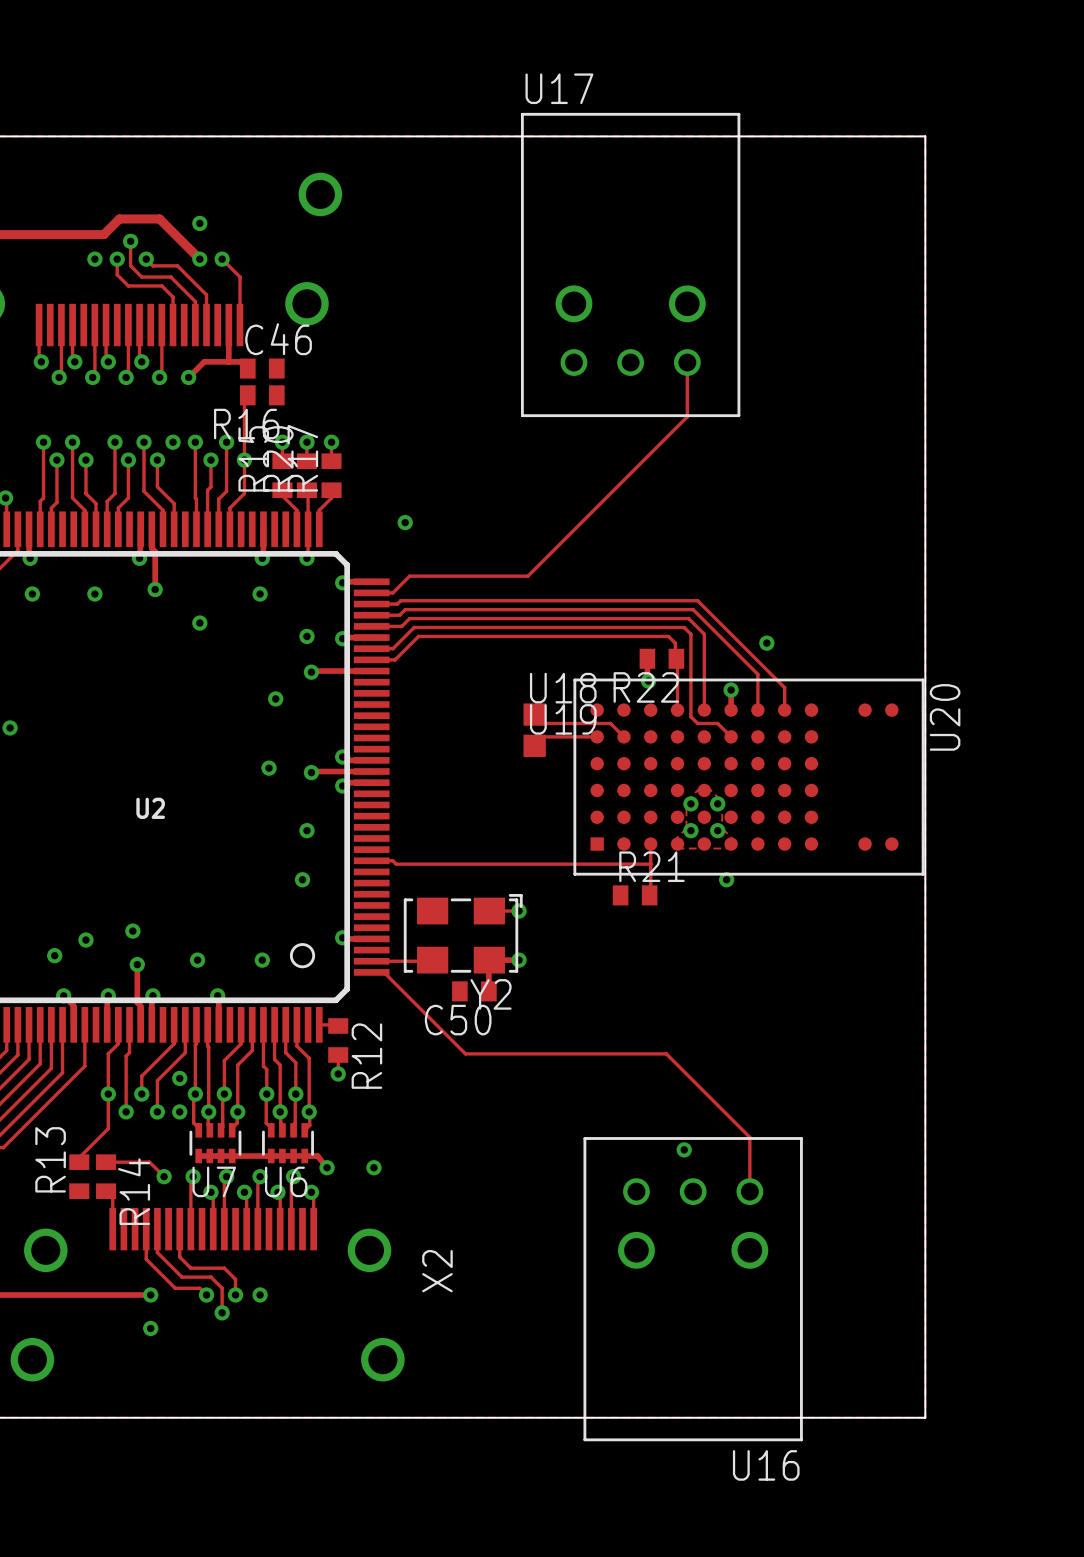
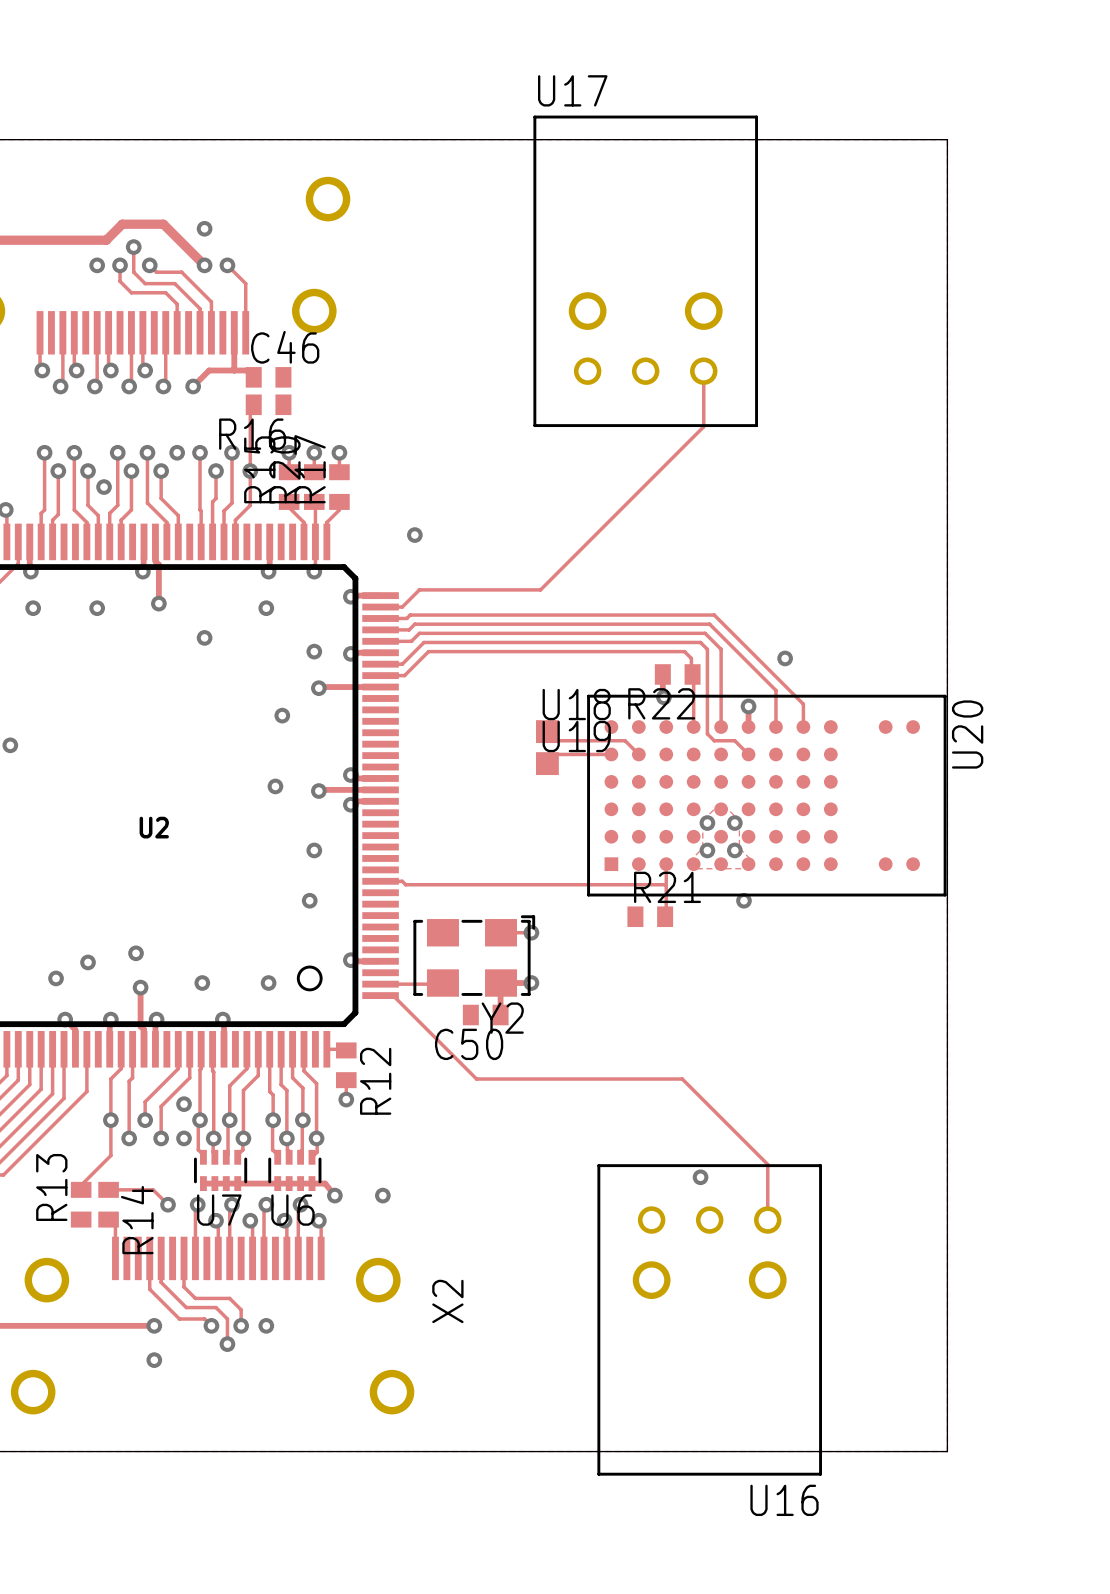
via: none -> (104, 487)

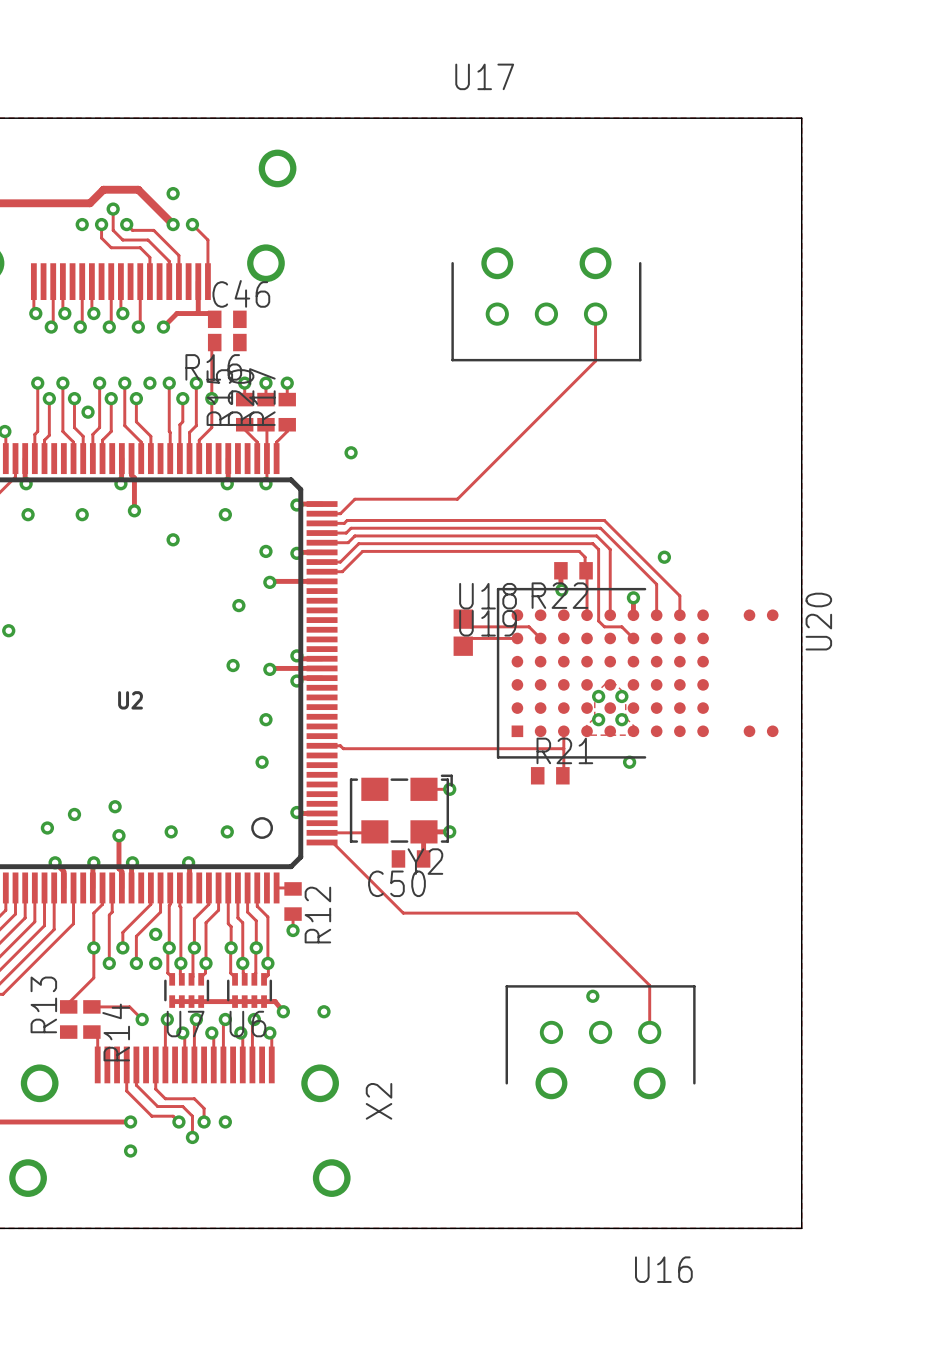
U17 footprint: [533, 115, 759, 428] -> [451, 247, 642, 362]
U20 footprint: [587, 694, 947, 897] -> [496, 587, 779, 759]
U16 footprint: [597, 1164, 822, 1476] -> [505, 985, 696, 1100]

